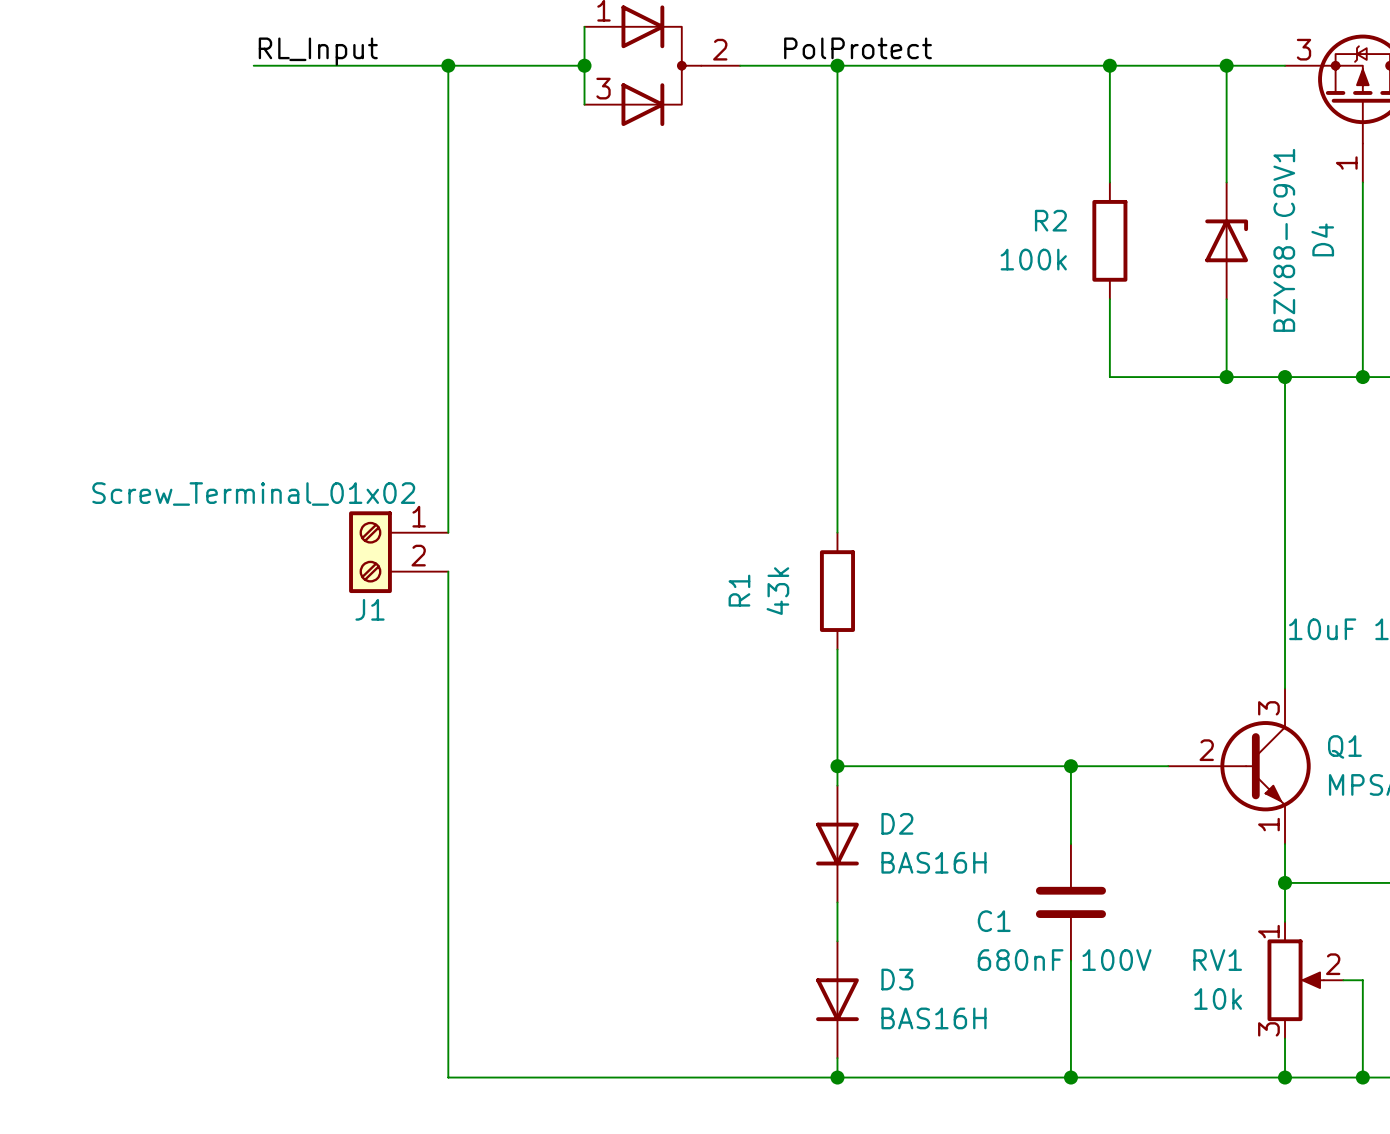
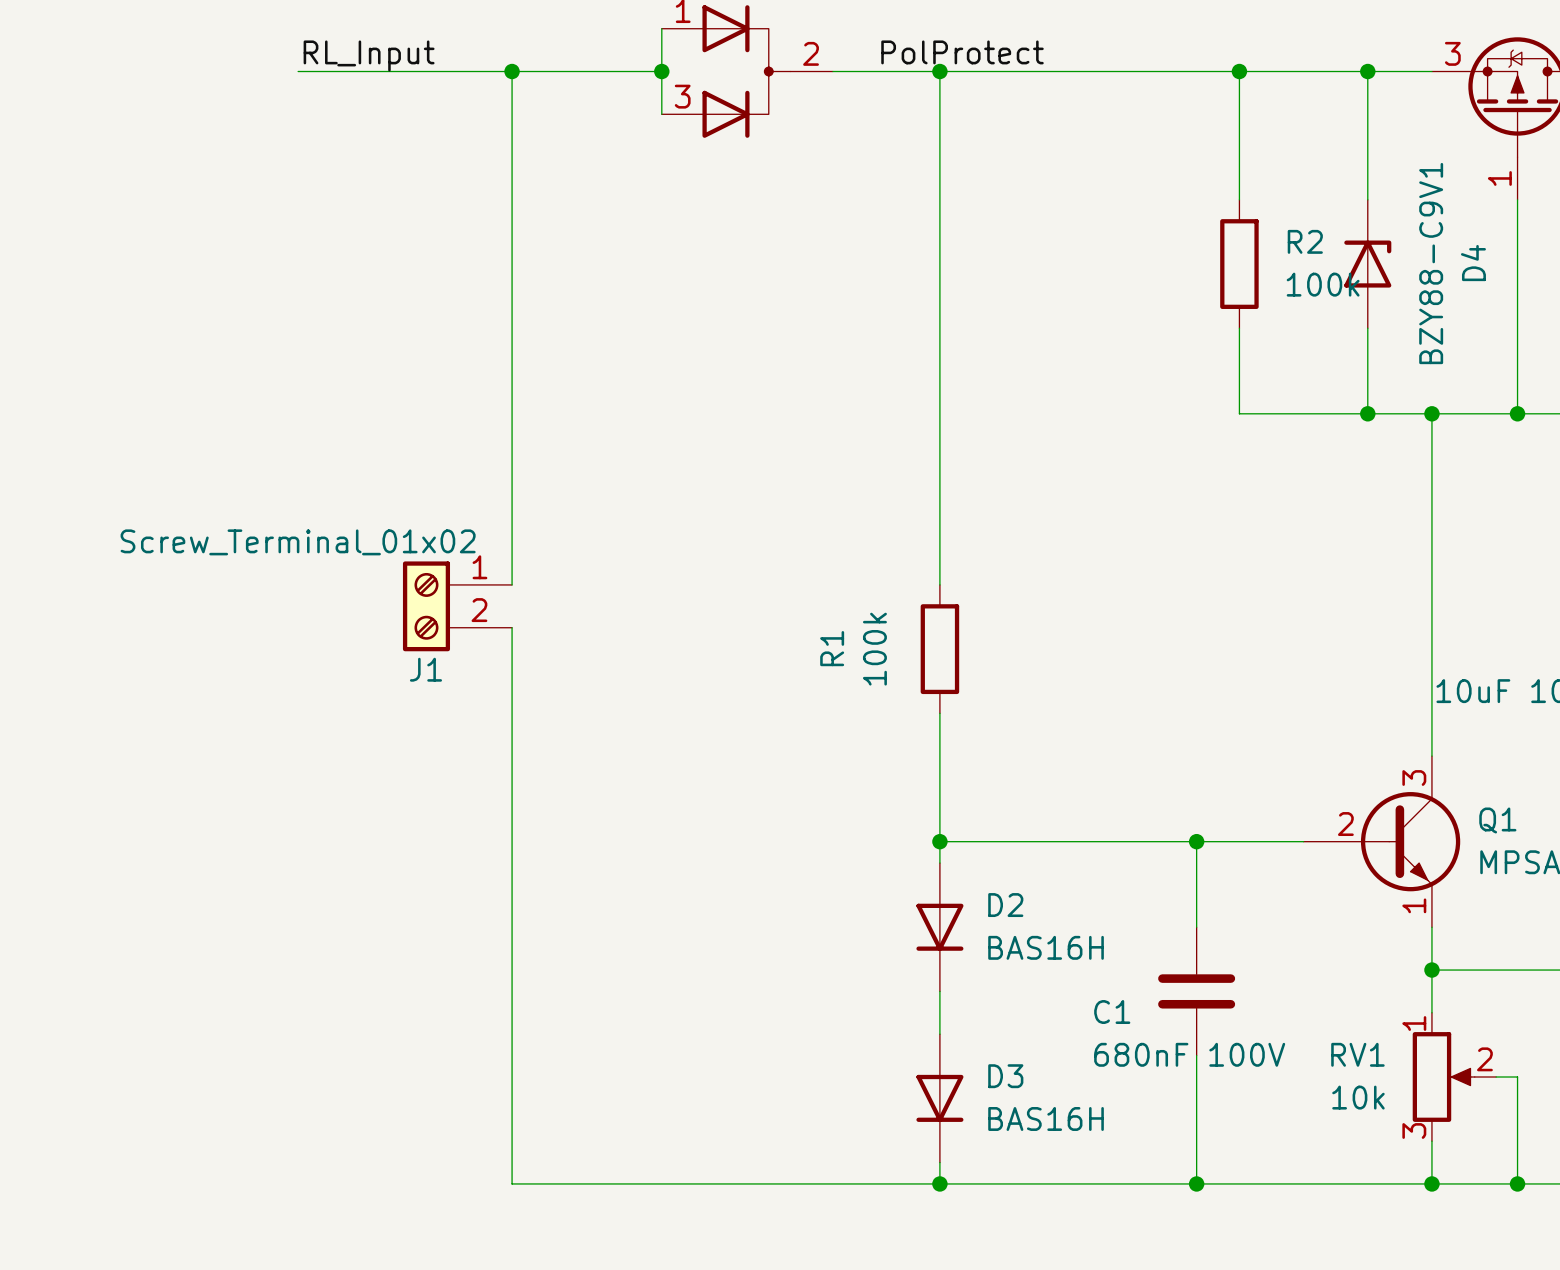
R2 name position: R2 (1050, 220) -> R2 (1305, 241)
R2 value position: 100k (1033, 259) -> 100k (1323, 284)
R1 value: 43k (777, 591) -> 100k (874, 649)

